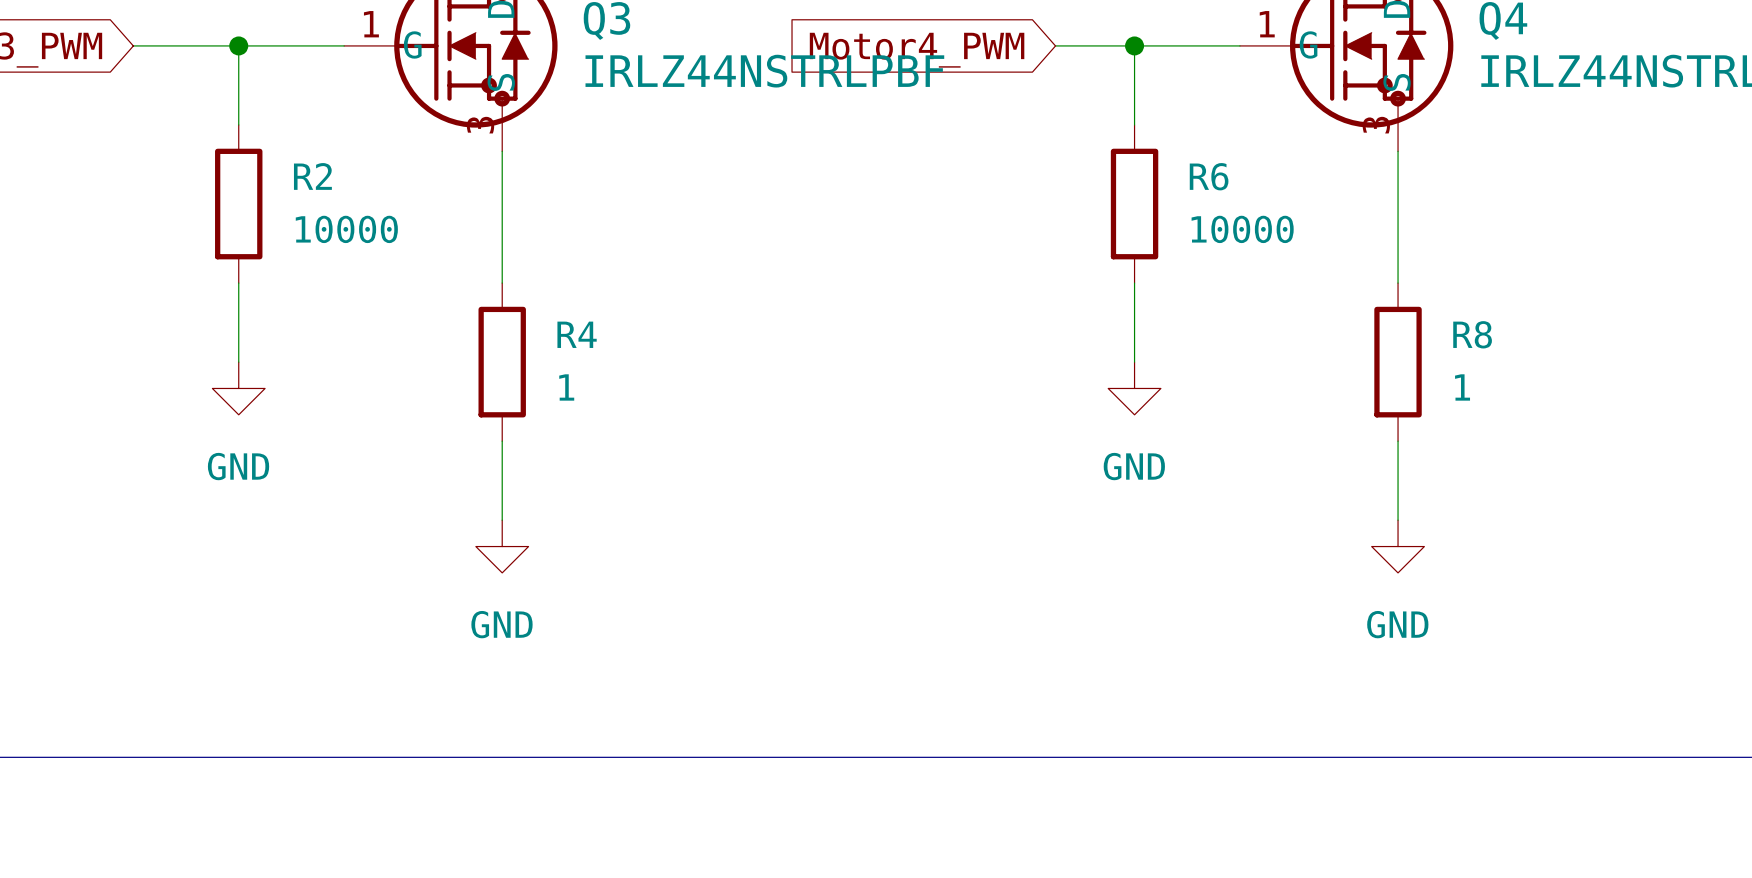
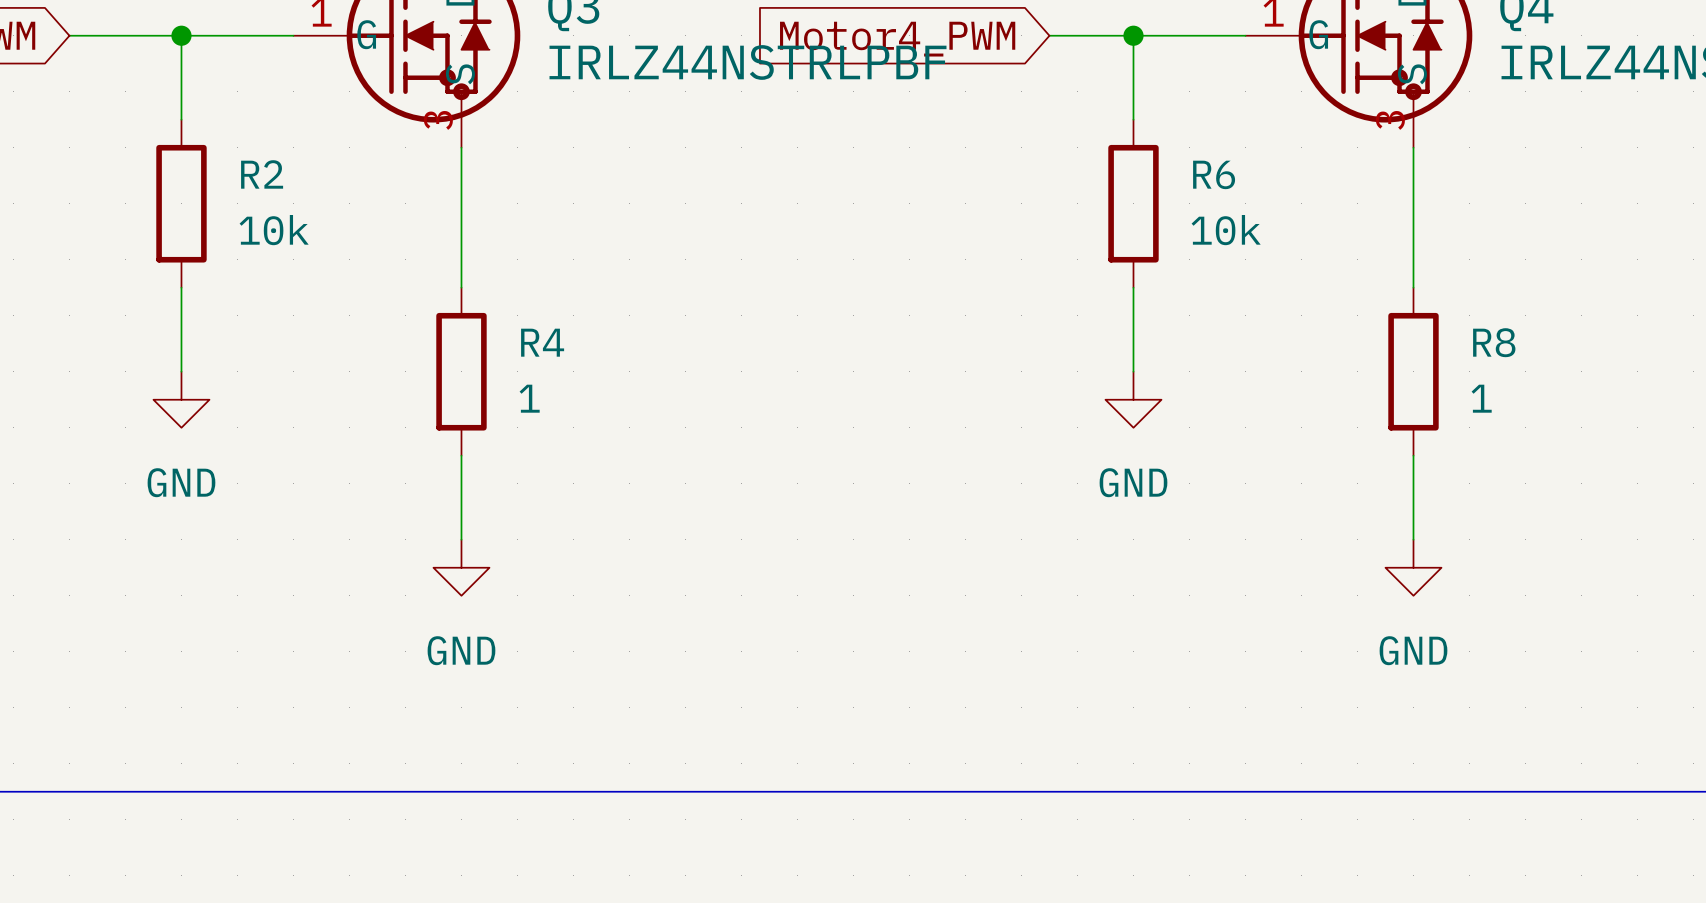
R2 value: 10000 (346, 229) -> 10k (274, 230)
R6 value: 10000 (1242, 229) -> 10k (1226, 230)

